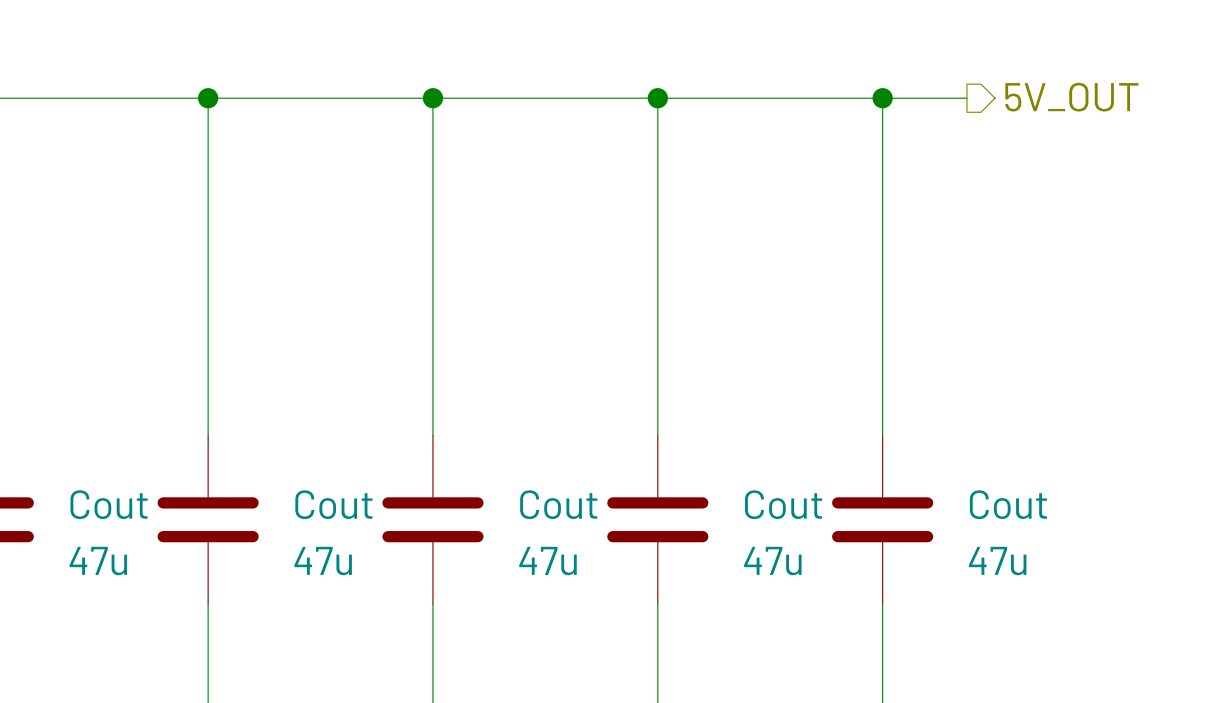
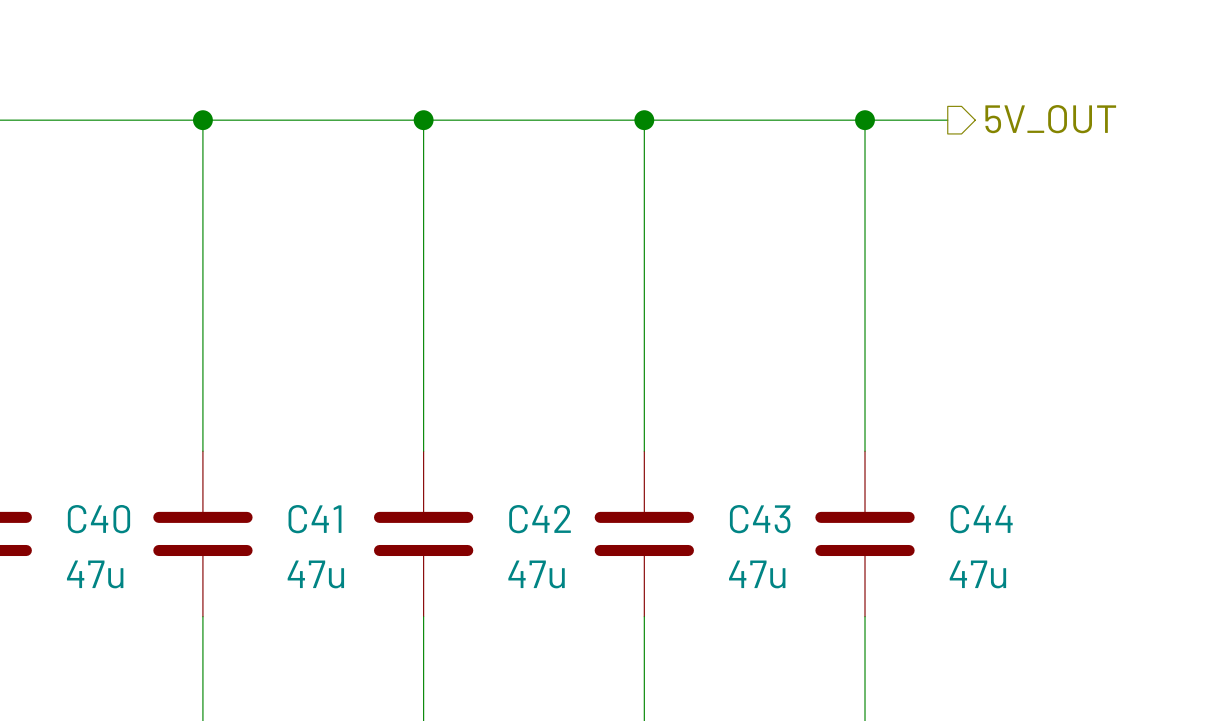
Cout name: Cout (109, 504) -> C40 (98, 519)
Cout name: Cout (333, 504) -> C41 (315, 519)
Cout name: Cout (558, 504) -> C42 (540, 519)
Cout name: Cout (783, 504) -> C43 (760, 519)
Cout name: Cout (1008, 504) -> C44 (981, 519)

